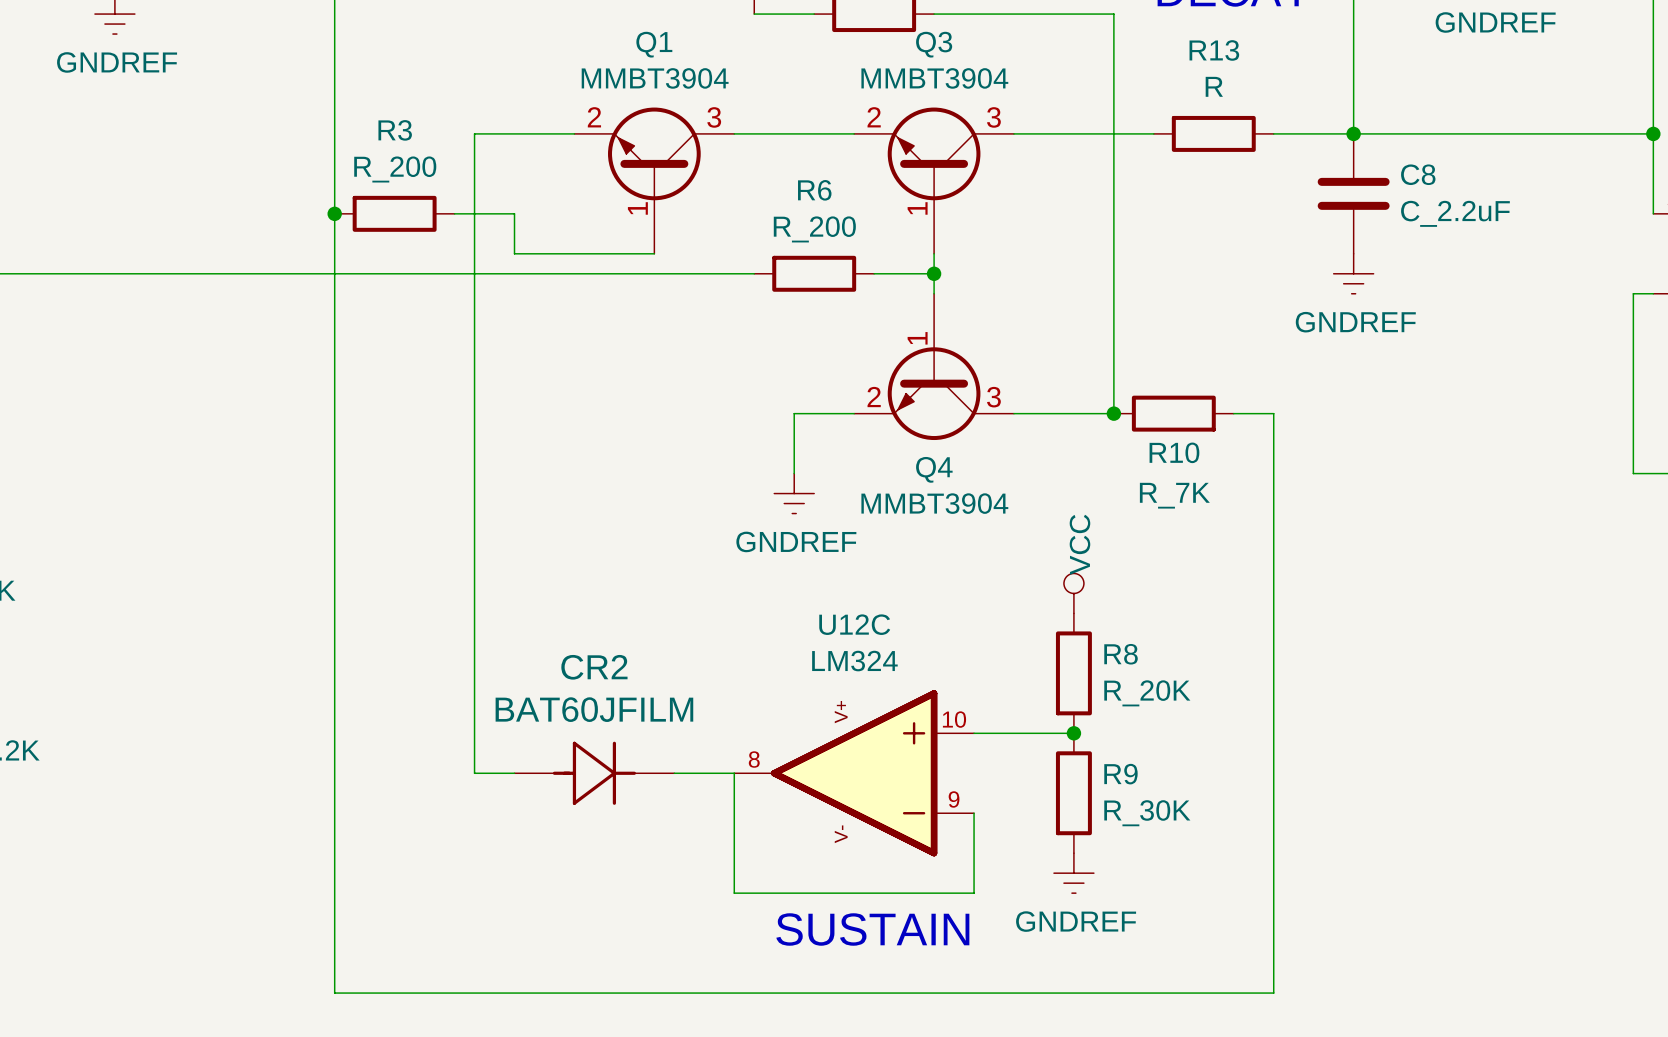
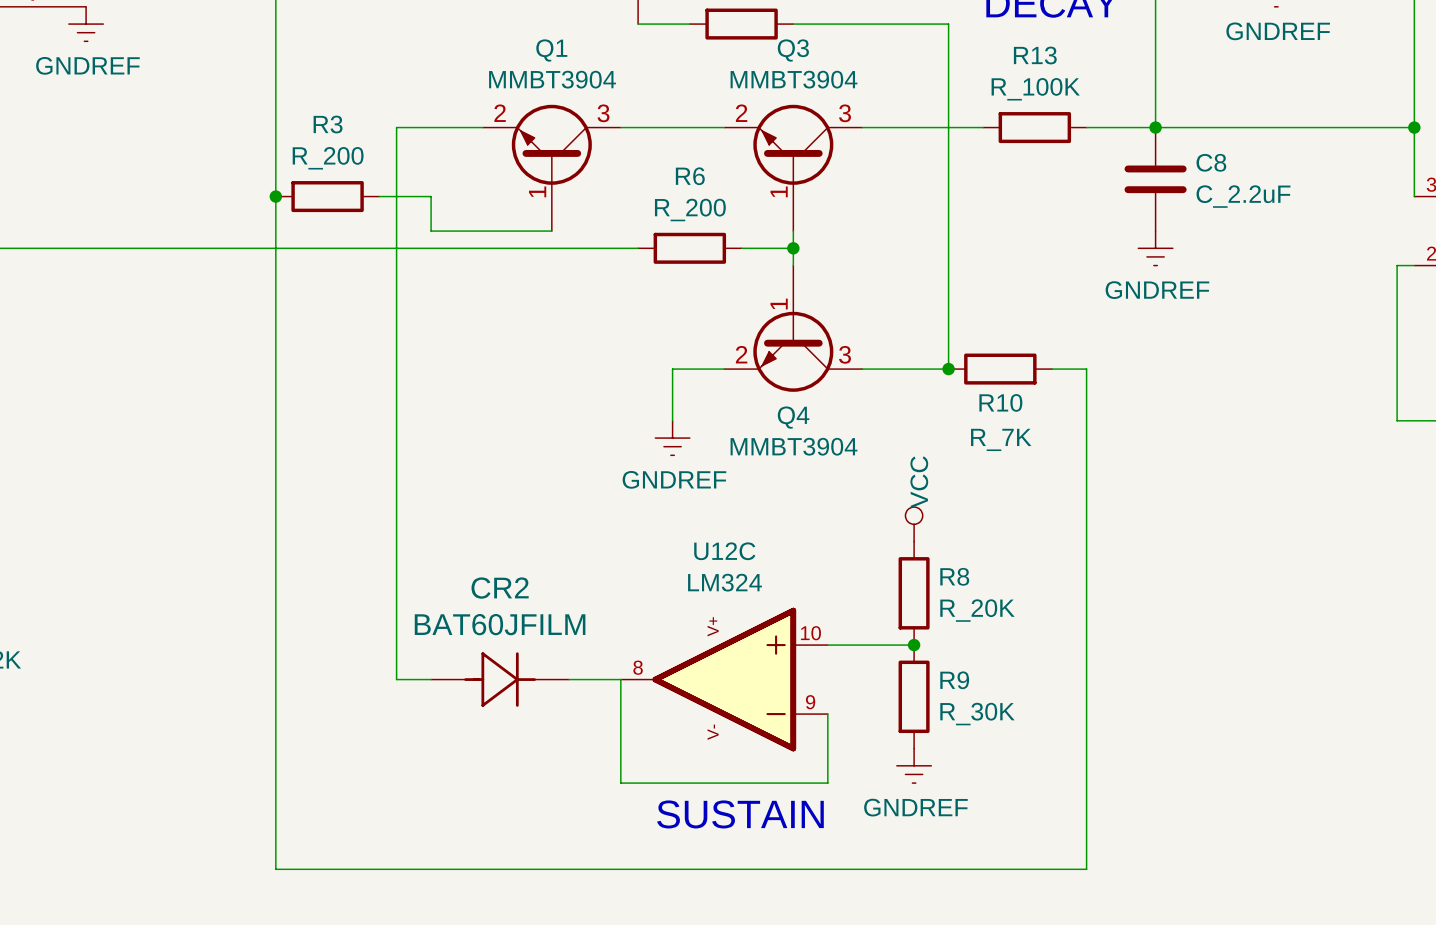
R13 value: R (1214, 86) -> R_100K (1035, 89)

